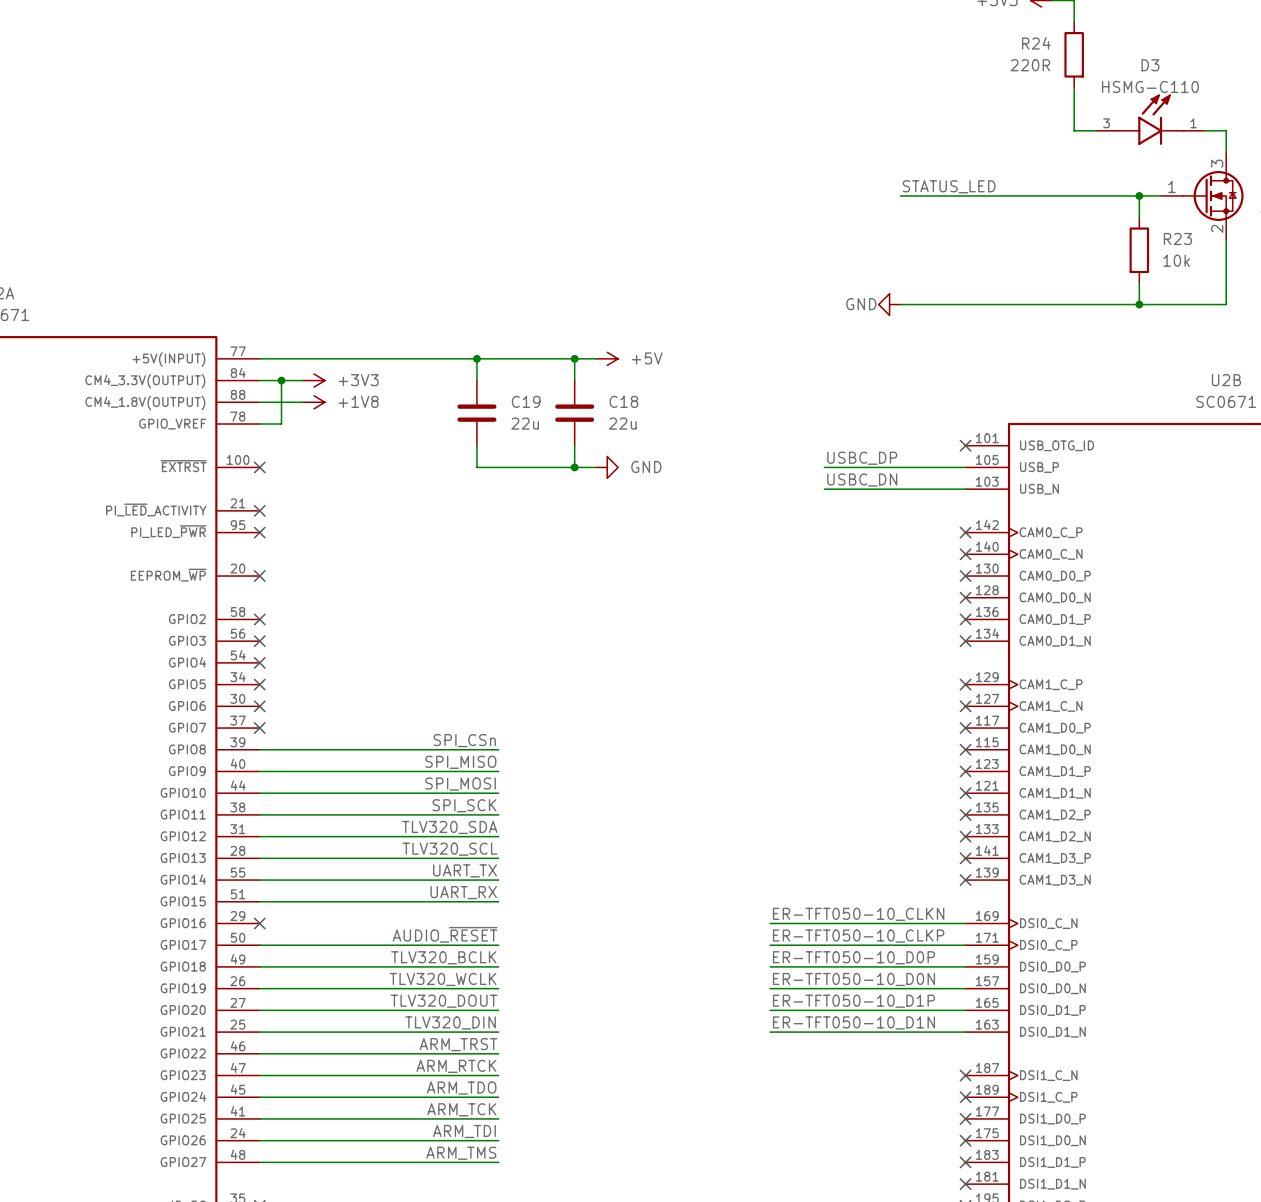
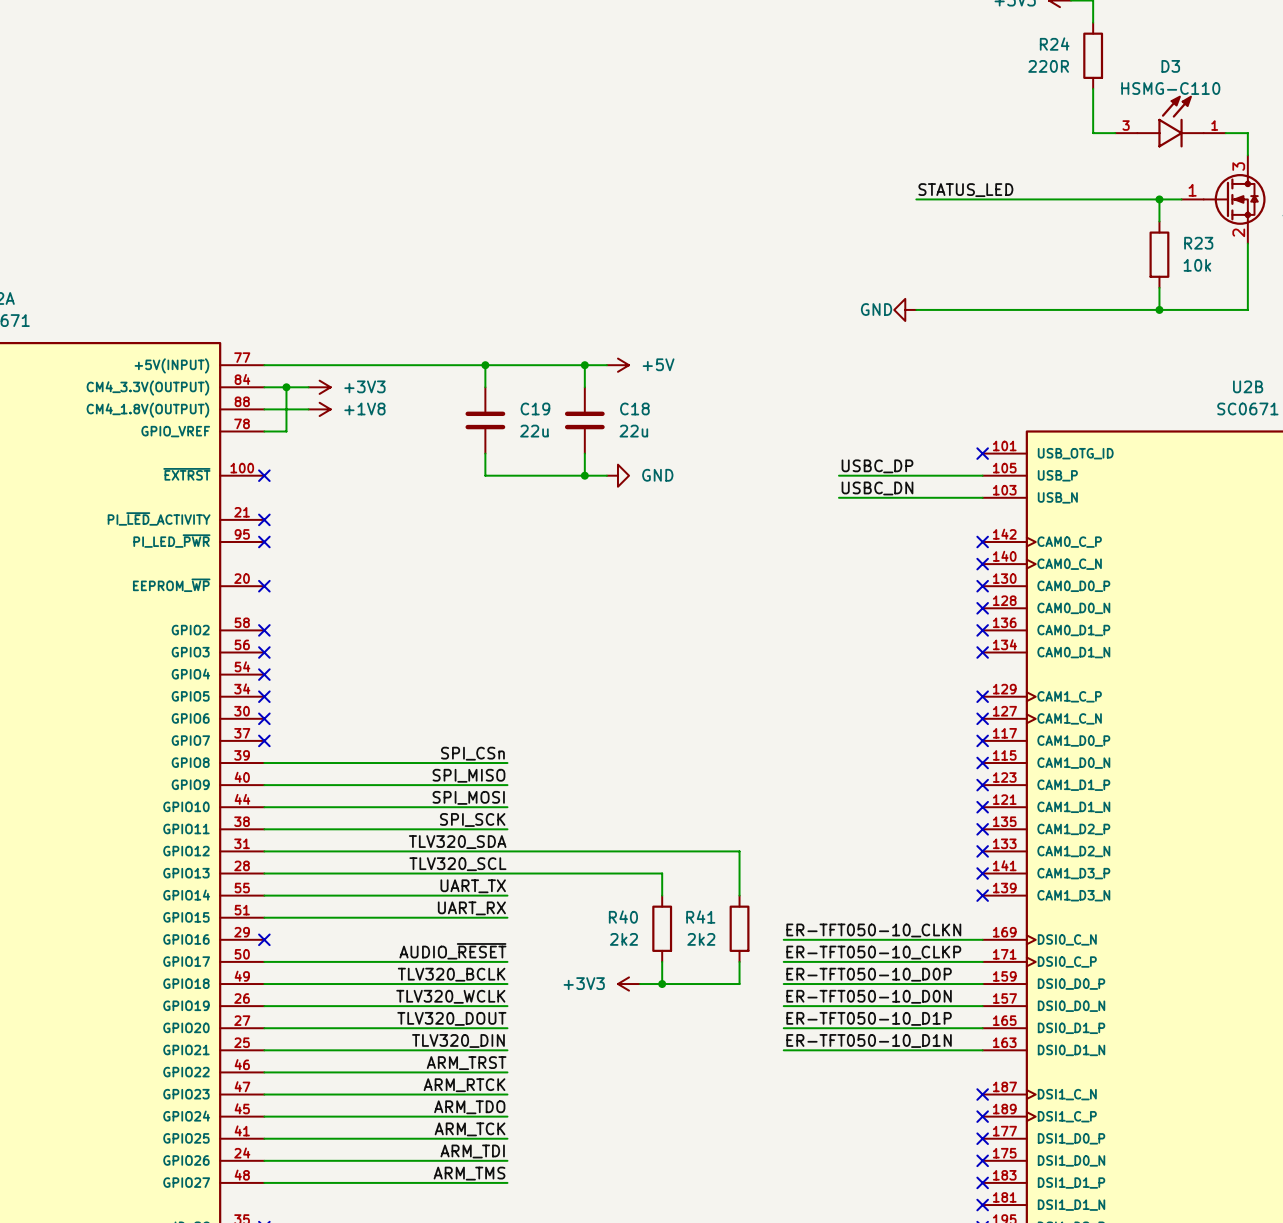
wire: none -> (507, 851) (739, 851) (739, 895)
wire: none -> (507, 873) (662, 873) (662, 895)
R40: none -> 2k2 (662, 928)
R41: none -> 2k2 (739, 928)
wire: none -> (662, 961) (662, 984)
wire: none -> (739, 961) (739, 984) (640, 984)
power symbol: none -> +3V3 (629, 984)
junction: none -> (662, 984)

